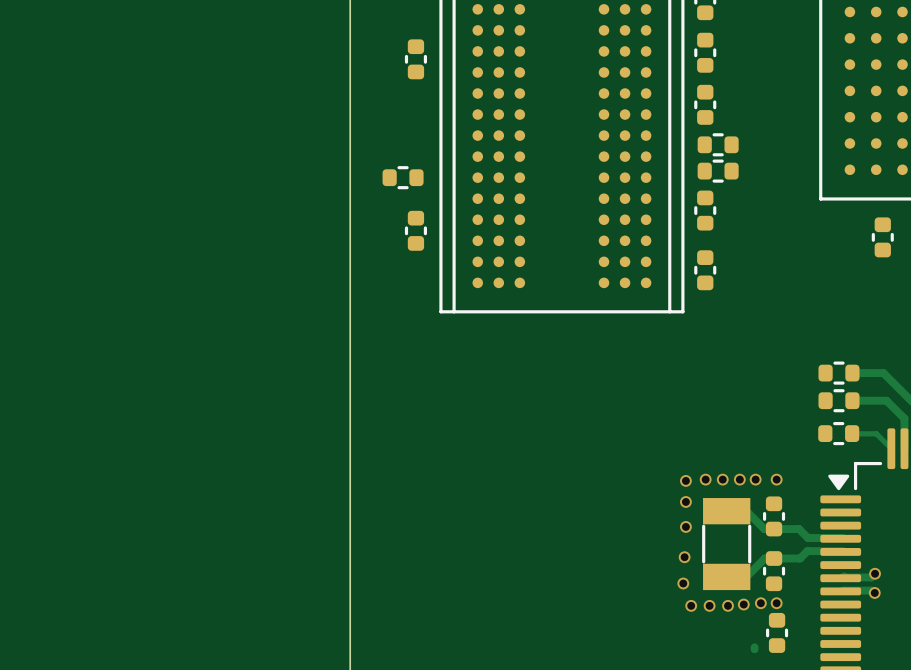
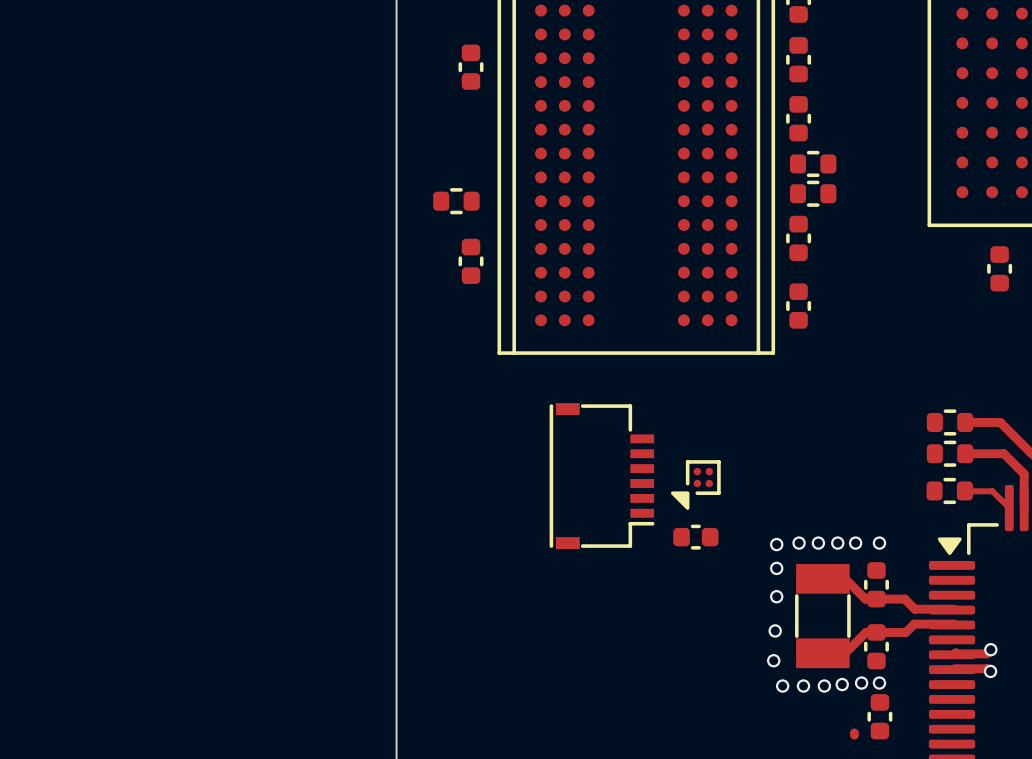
part: none -> (602, 476)
part: none -> (695, 485)
part: none -> (695, 537)

